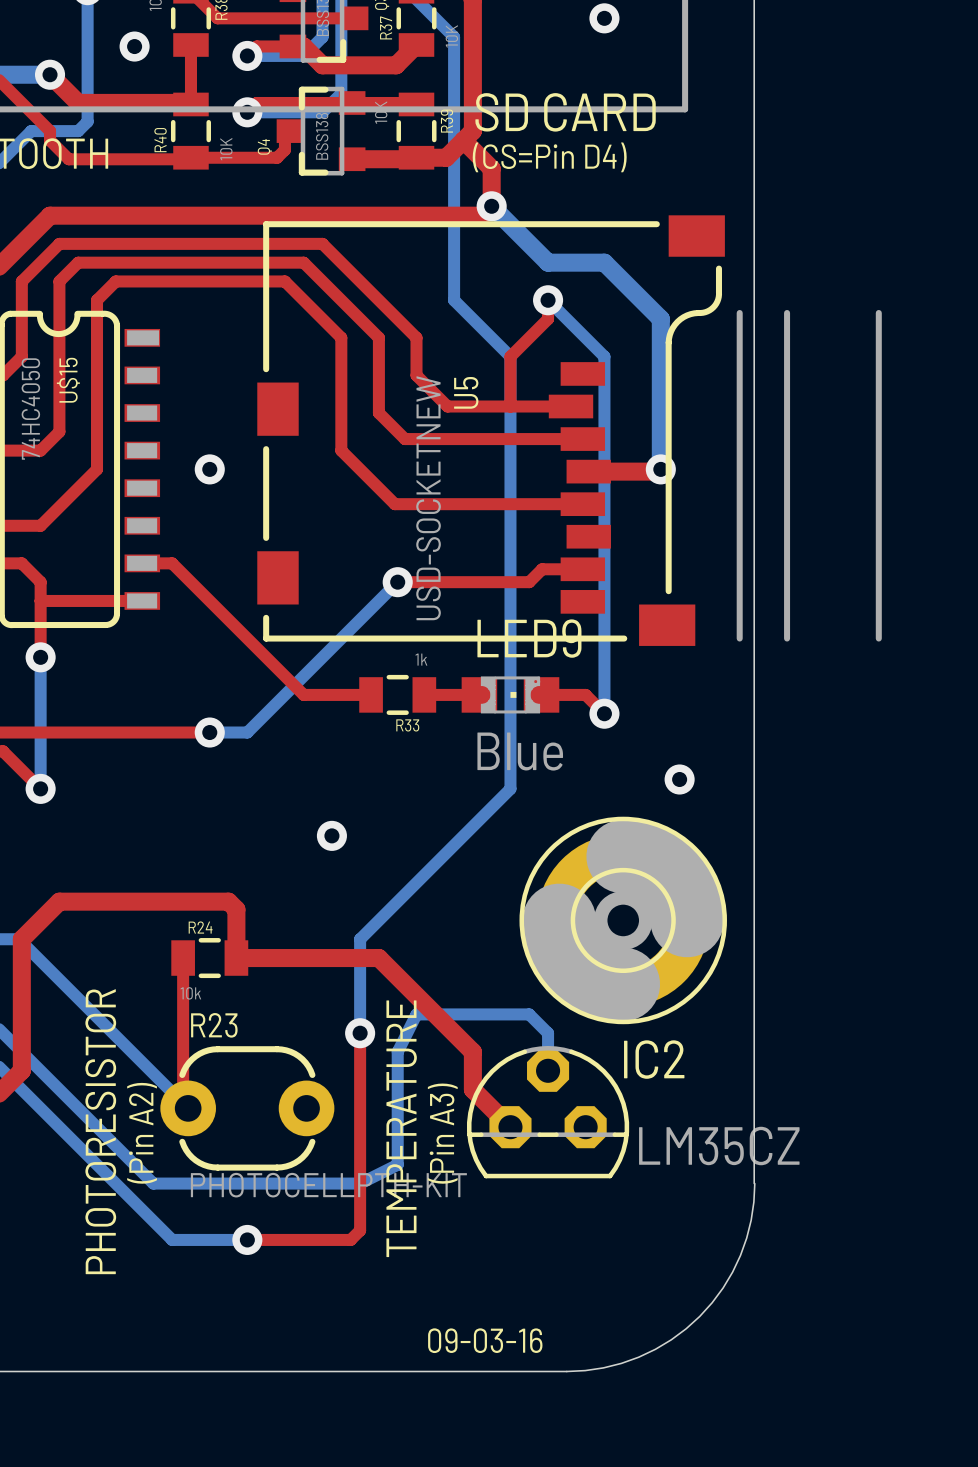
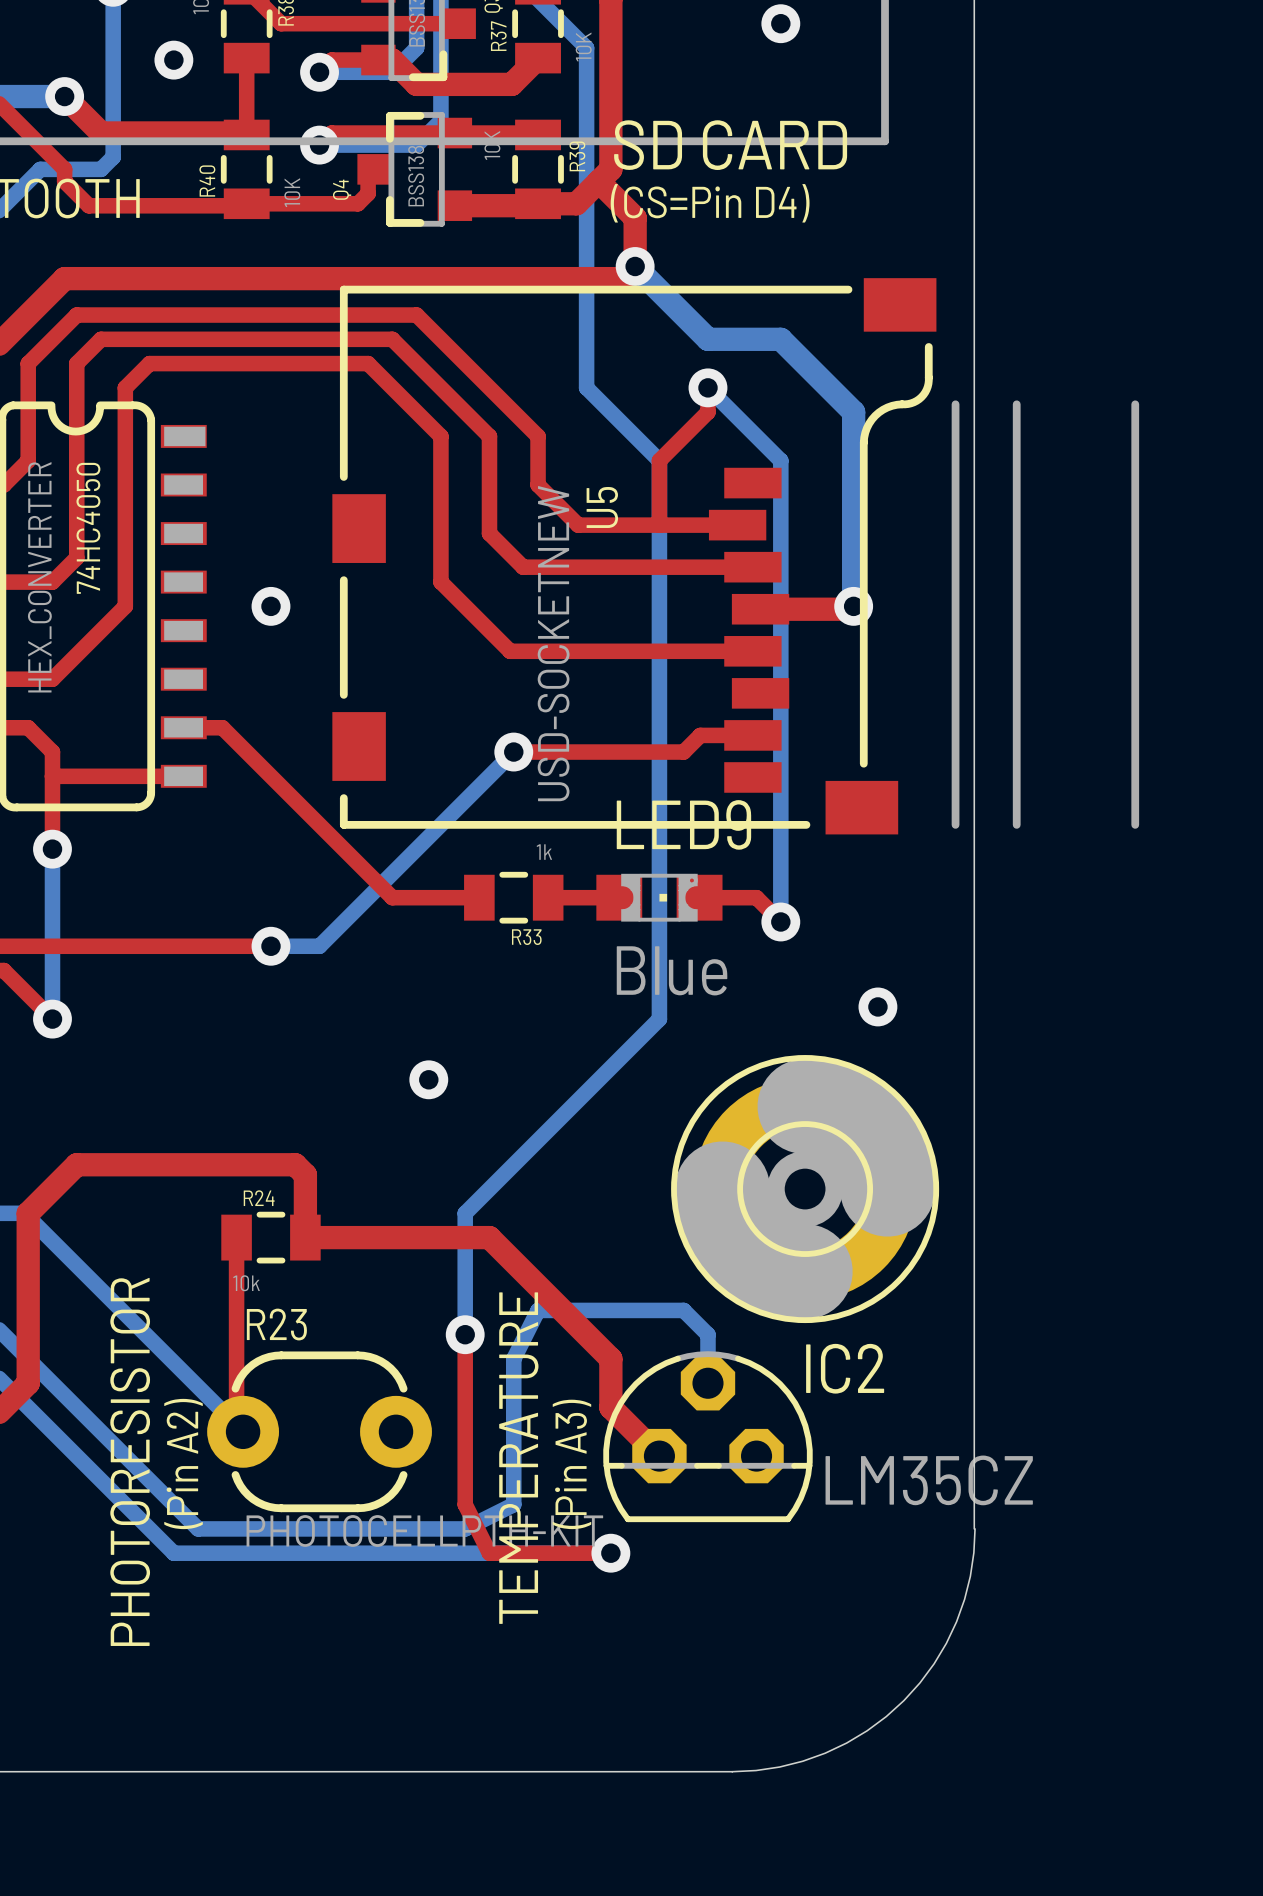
U$15 name: U$15 (68, 380) -> 74HC4050 (88, 528)
U$15 value: 74HC4050 (30, 409) -> HEX_CONVERTER (39, 577)
top track: (360, 1164) (360, 1230) (350, 1239) (247, 1239) -> (465, 1504) (489, 1553) (610, 1553)
bottom track: (134, 1202) (172, 1239) (247, 1239) -> (173, 1553) (610, 1553)
via: none -> (610, 1553)
via: (247, 1239) -> none
text: 09-03-16 (485, 1340) -> none

